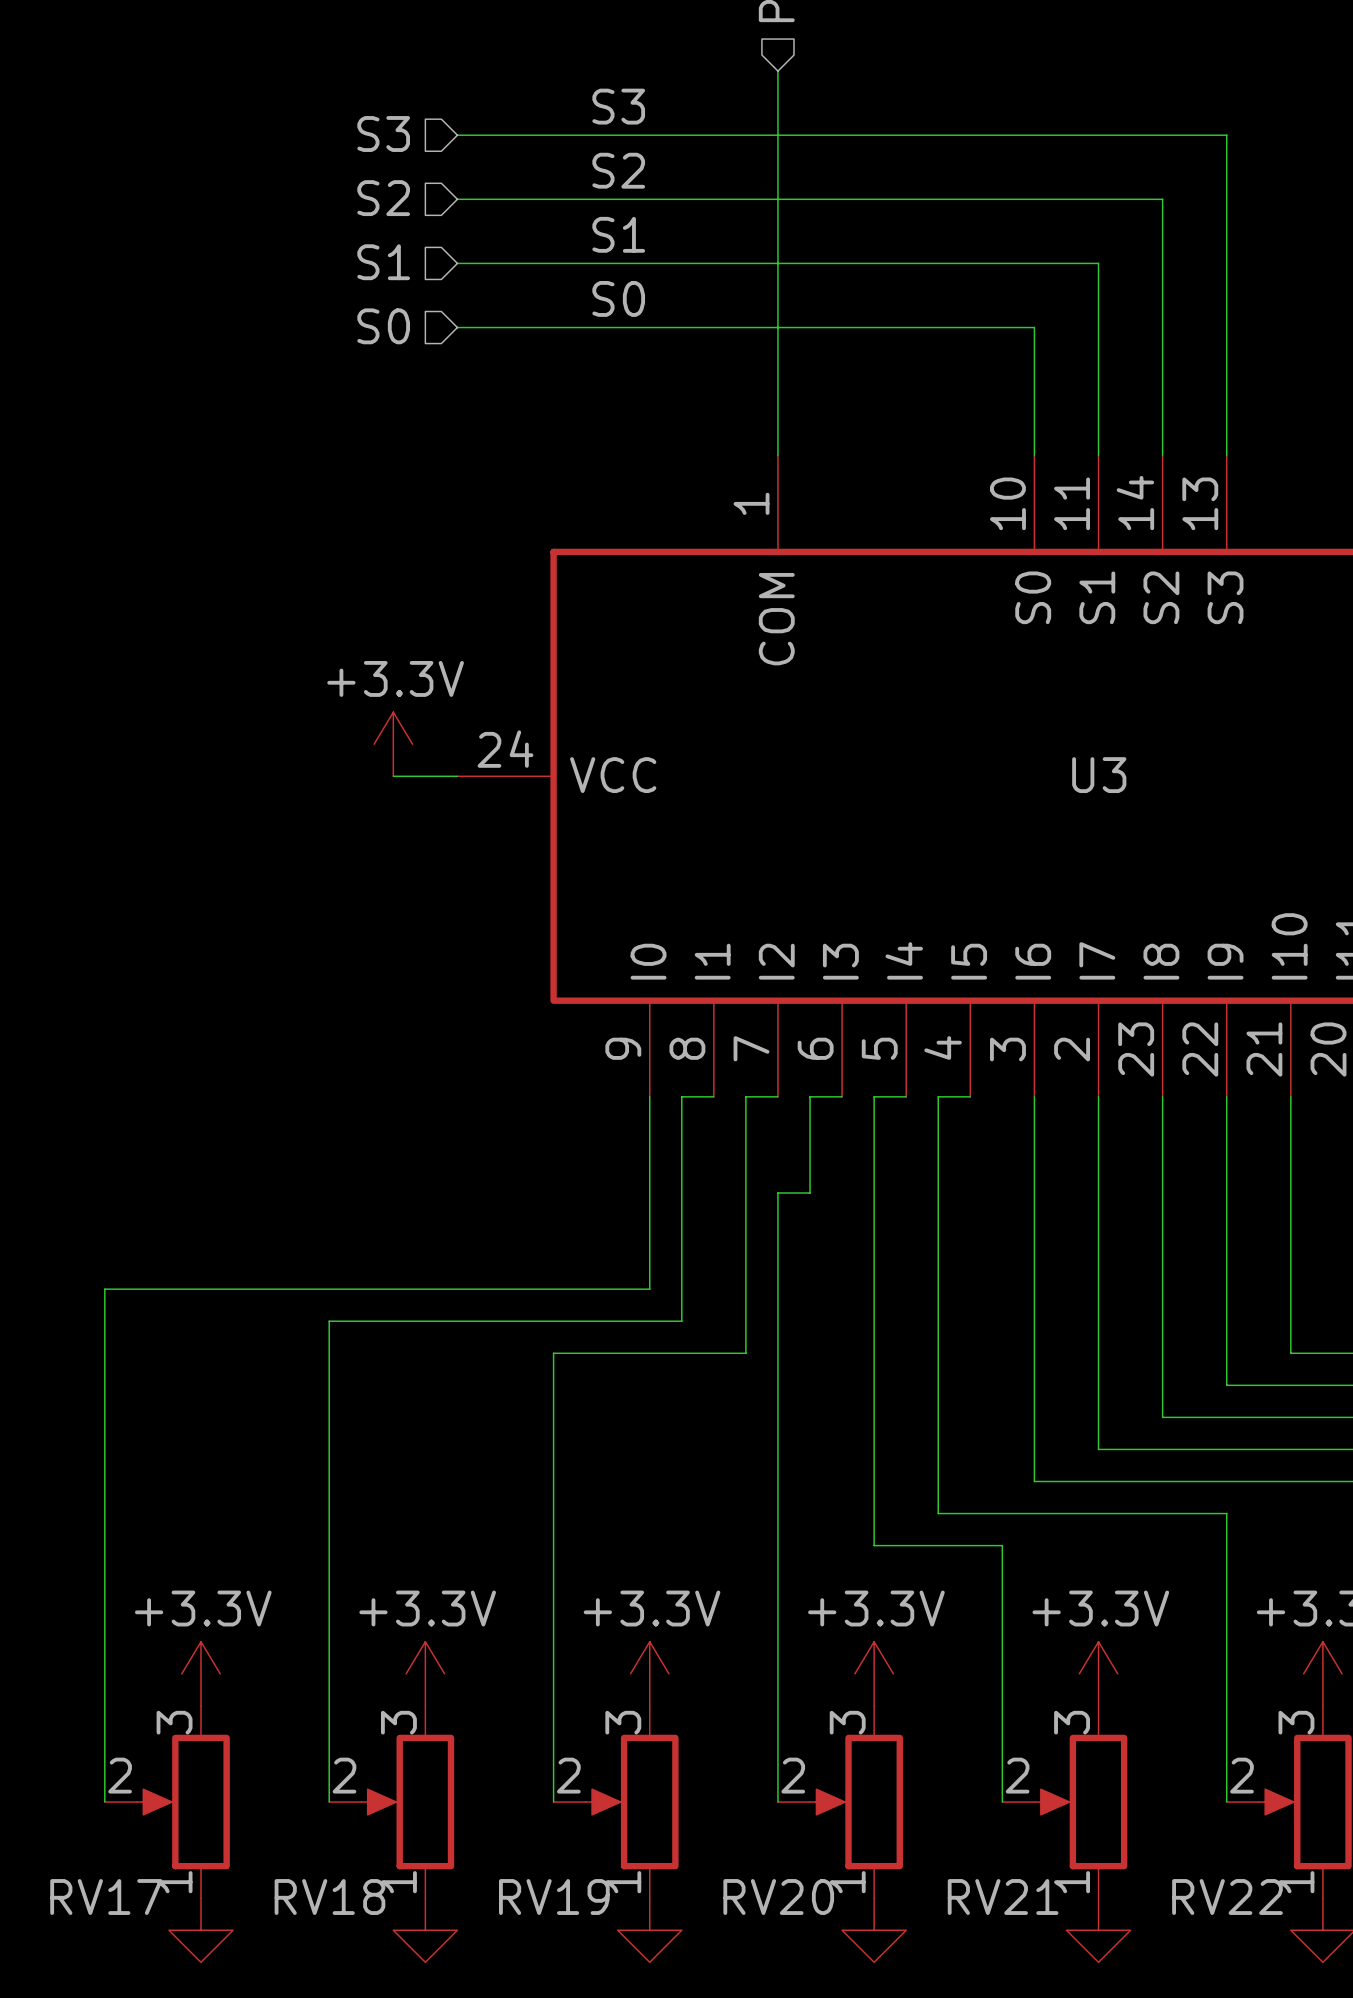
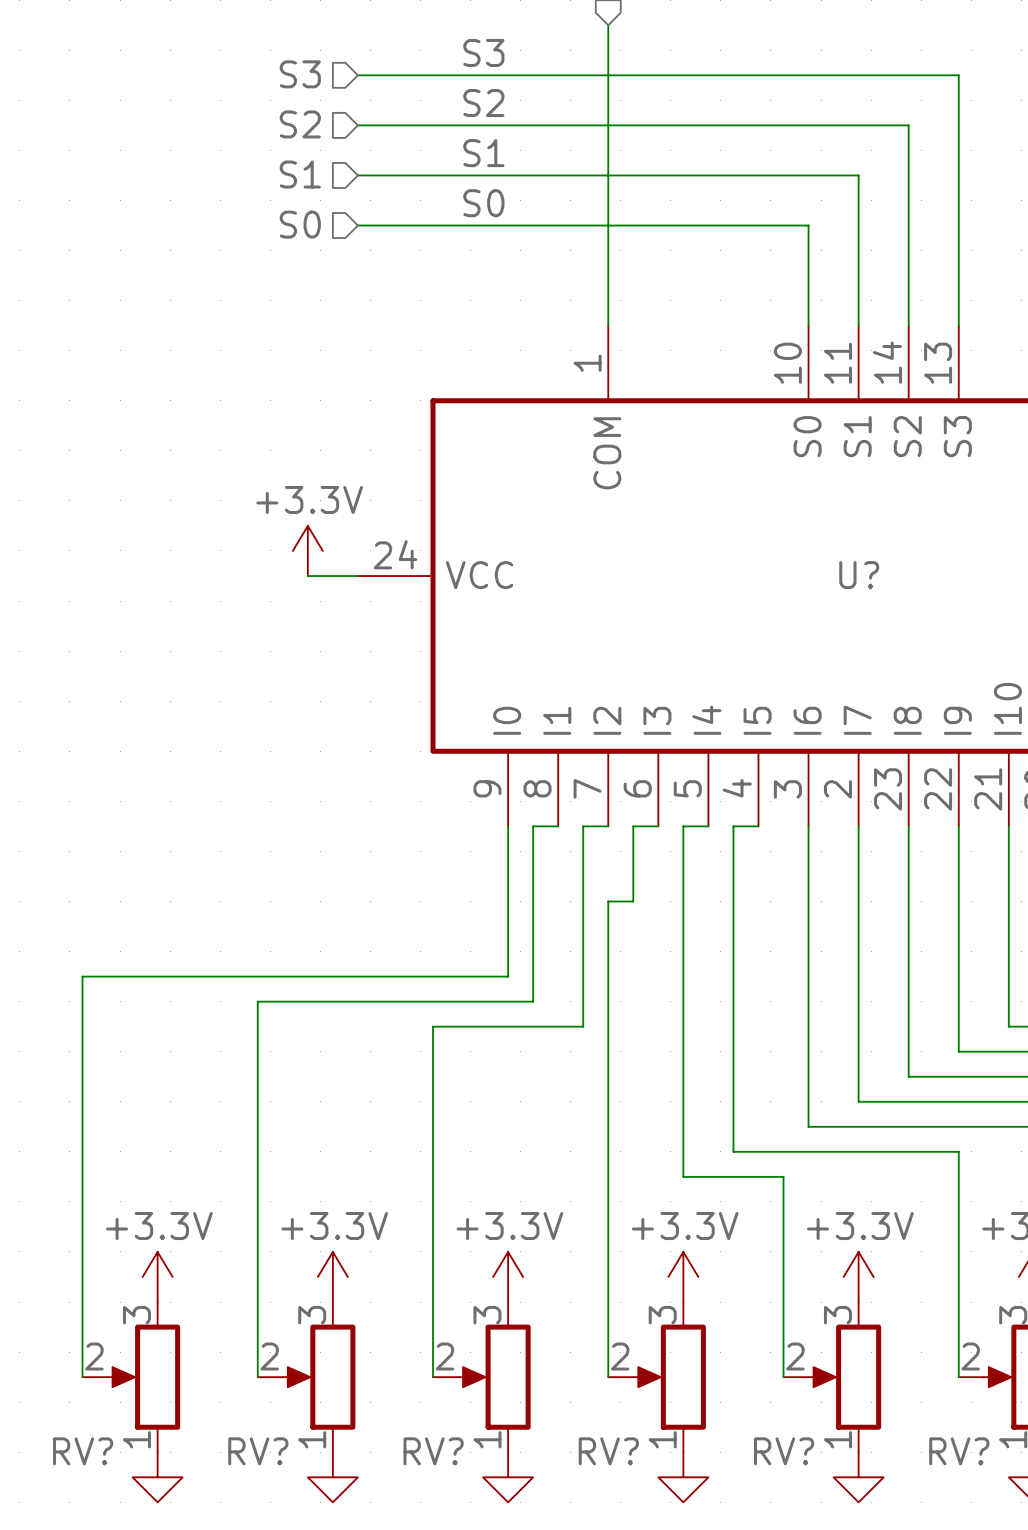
U3 name: U3 (1099, 775) -> U? (859, 575)
RV17 name: RV17 (106, 1897) -> RV? (83, 1451)
RV18 name: RV18 (329, 1897) -> RV? (258, 1451)
RV19 name: RV19 (554, 1897) -> RV? (433, 1451)
RV20 name: RV20 (778, 1897) -> RV? (608, 1451)
RV21 name: RV21 (1003, 1897) -> RV? (784, 1451)
RV22 name: RV22 (1227, 1897) -> RV? (959, 1451)

